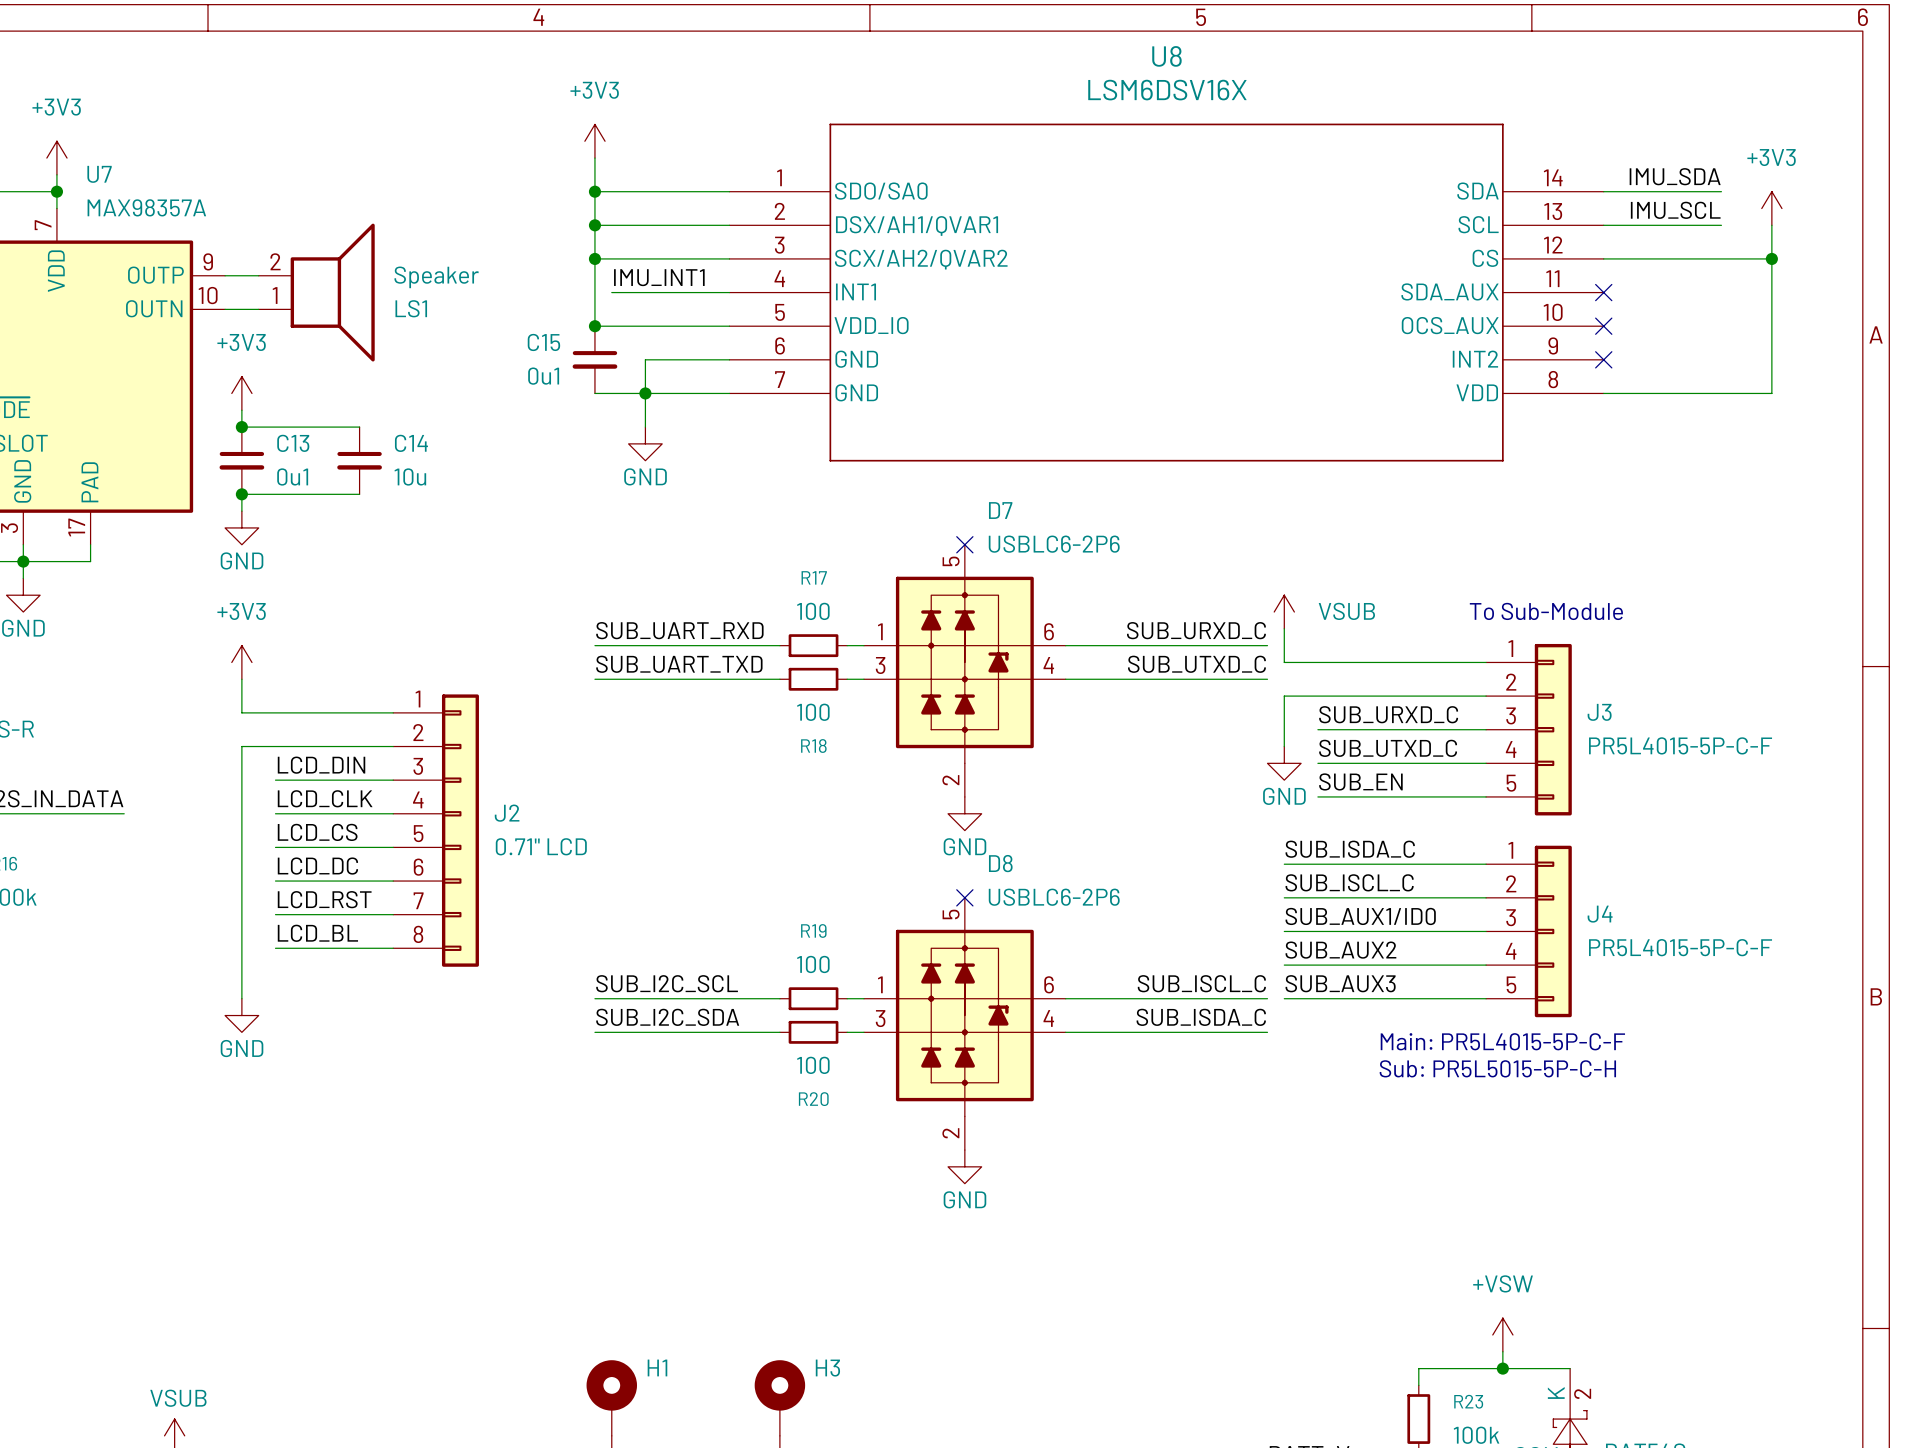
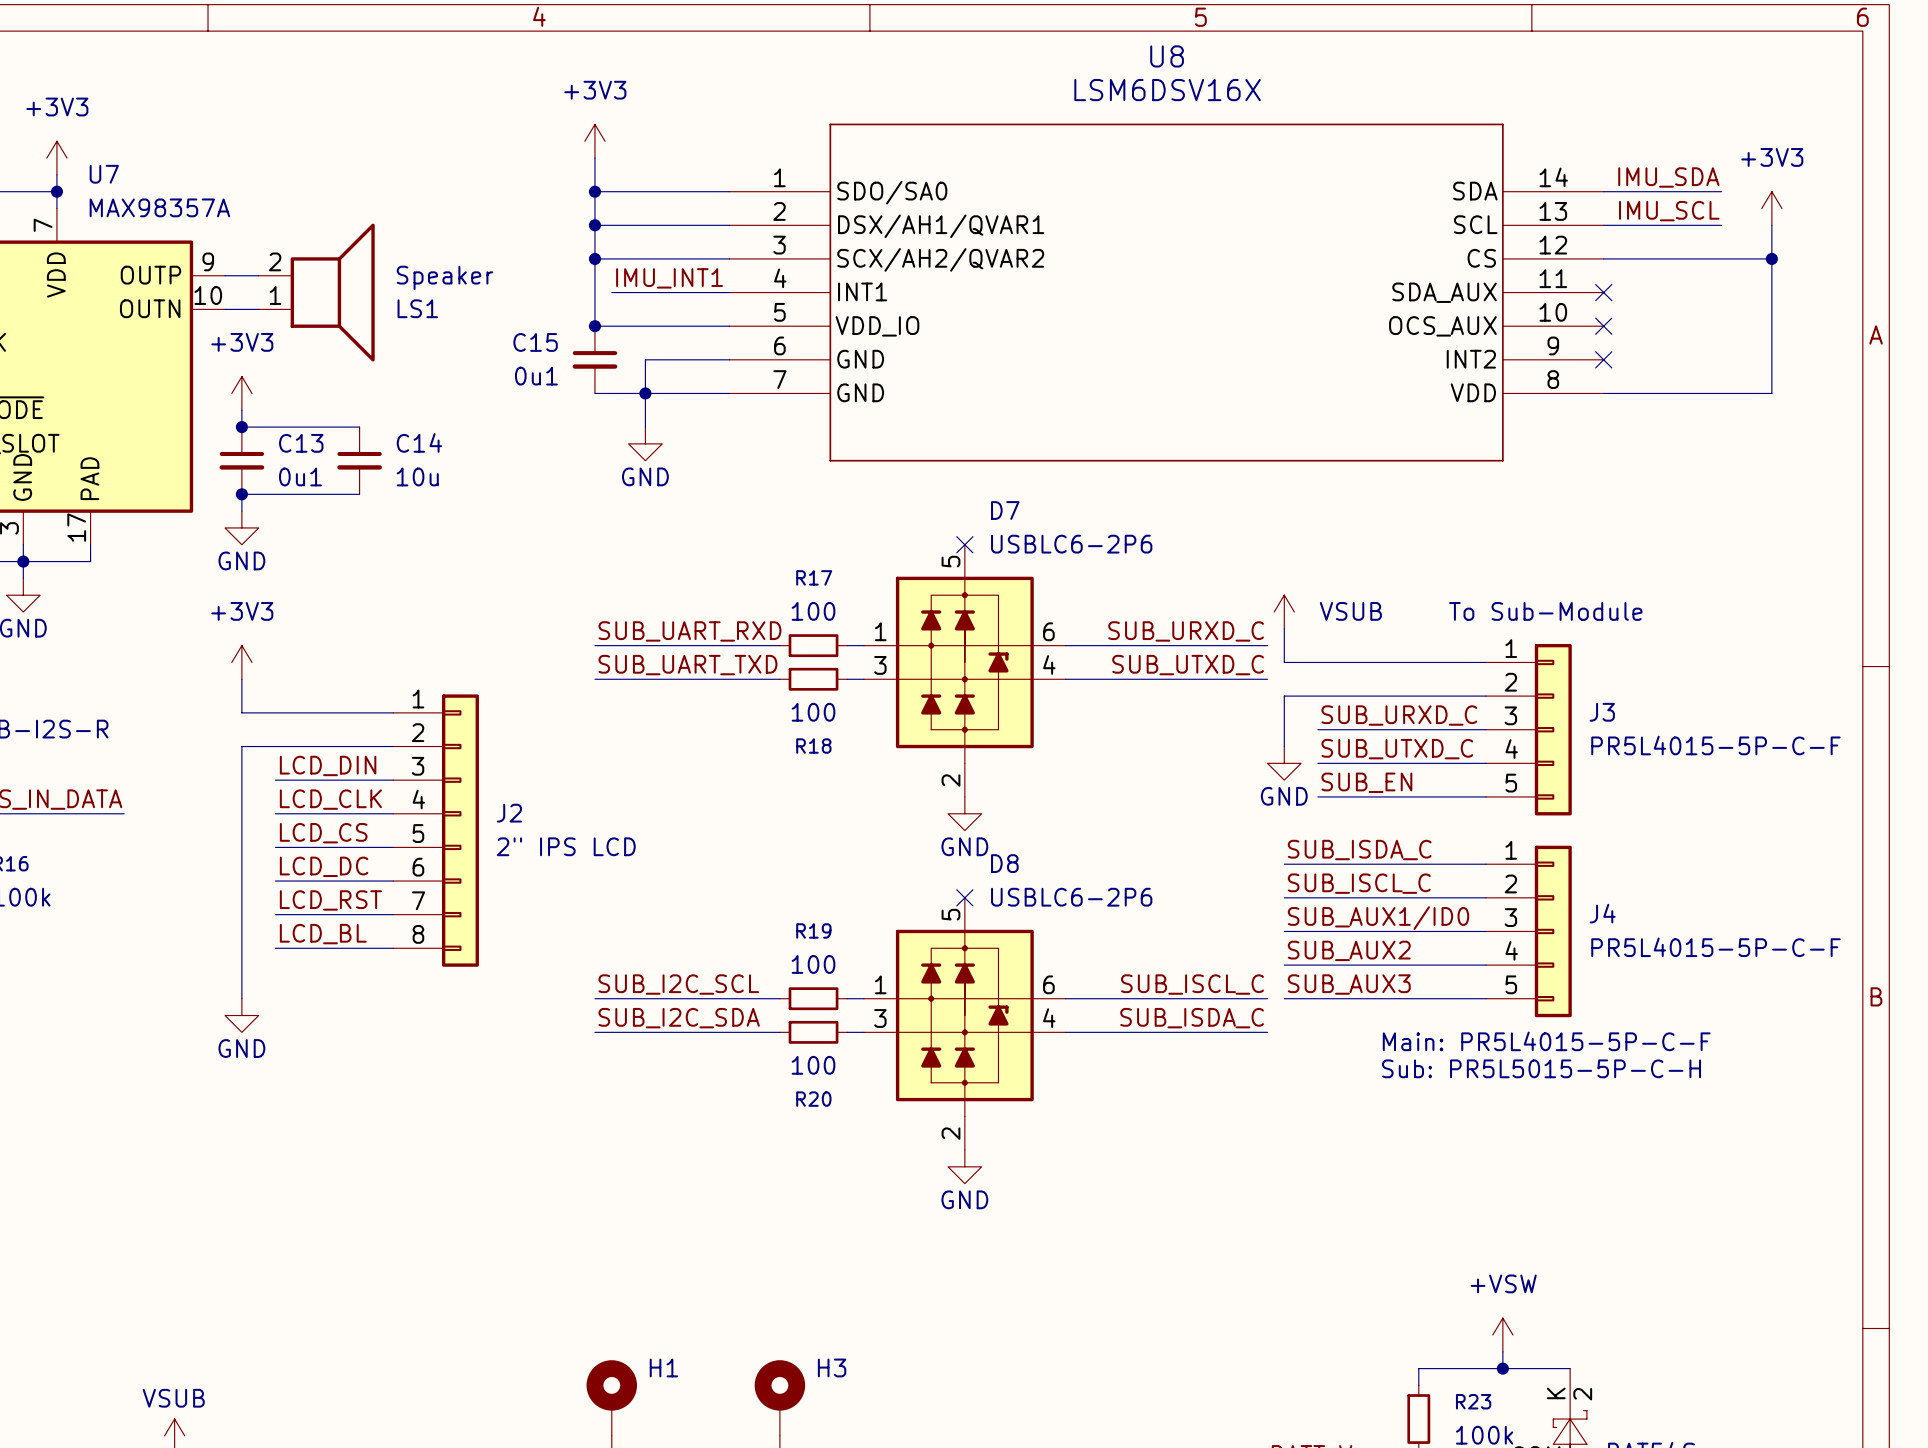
J2 value: 0.71" LCD (541, 846) -> 2" IPS LCD (566, 846)

